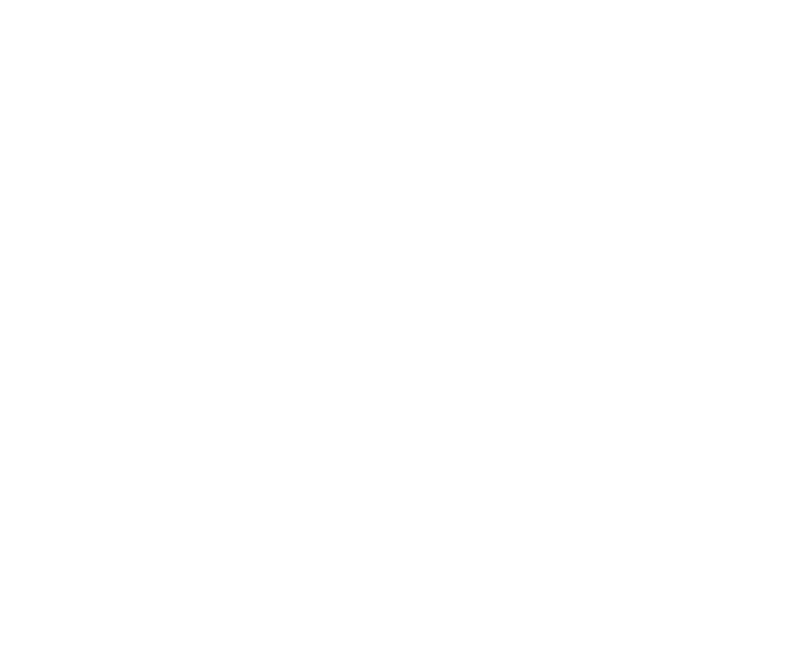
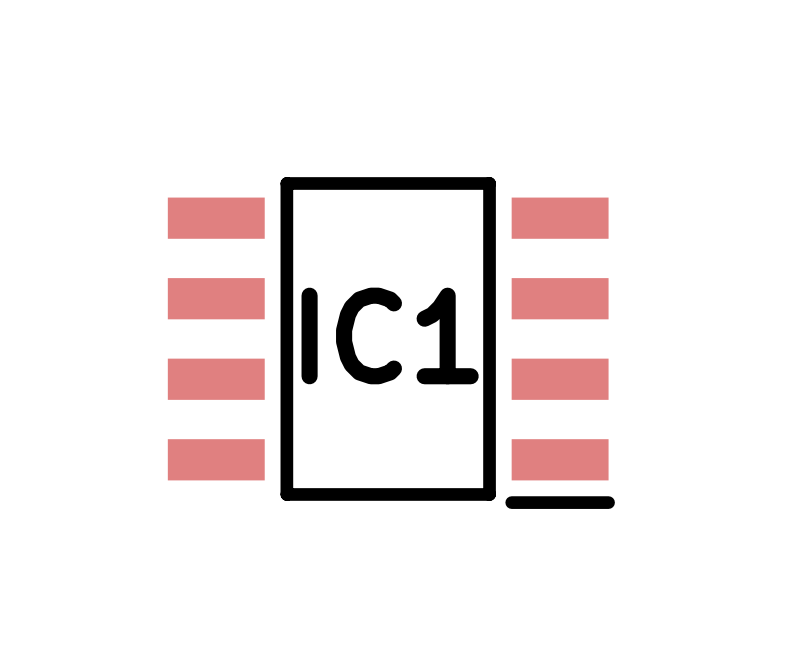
IC1: none -> (391, 343)

